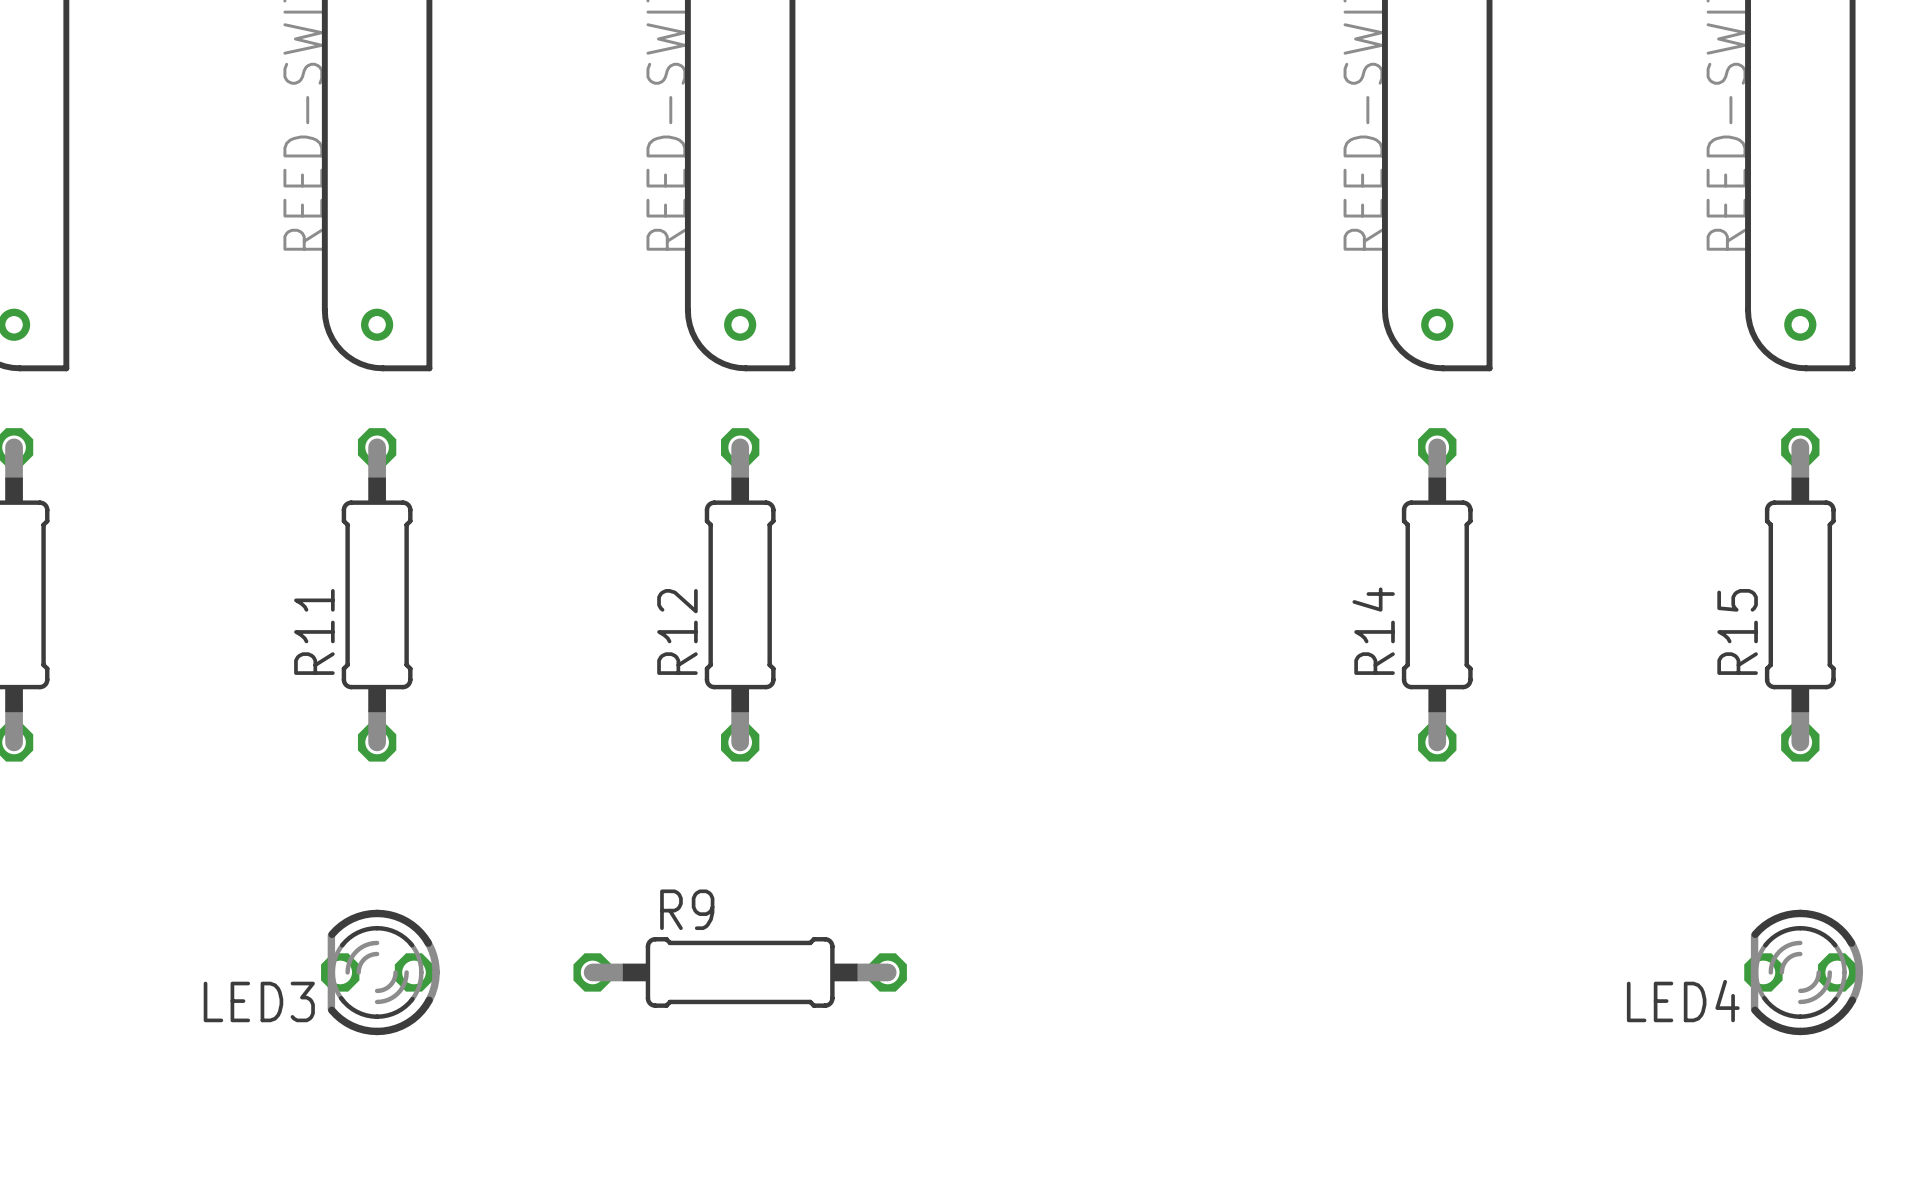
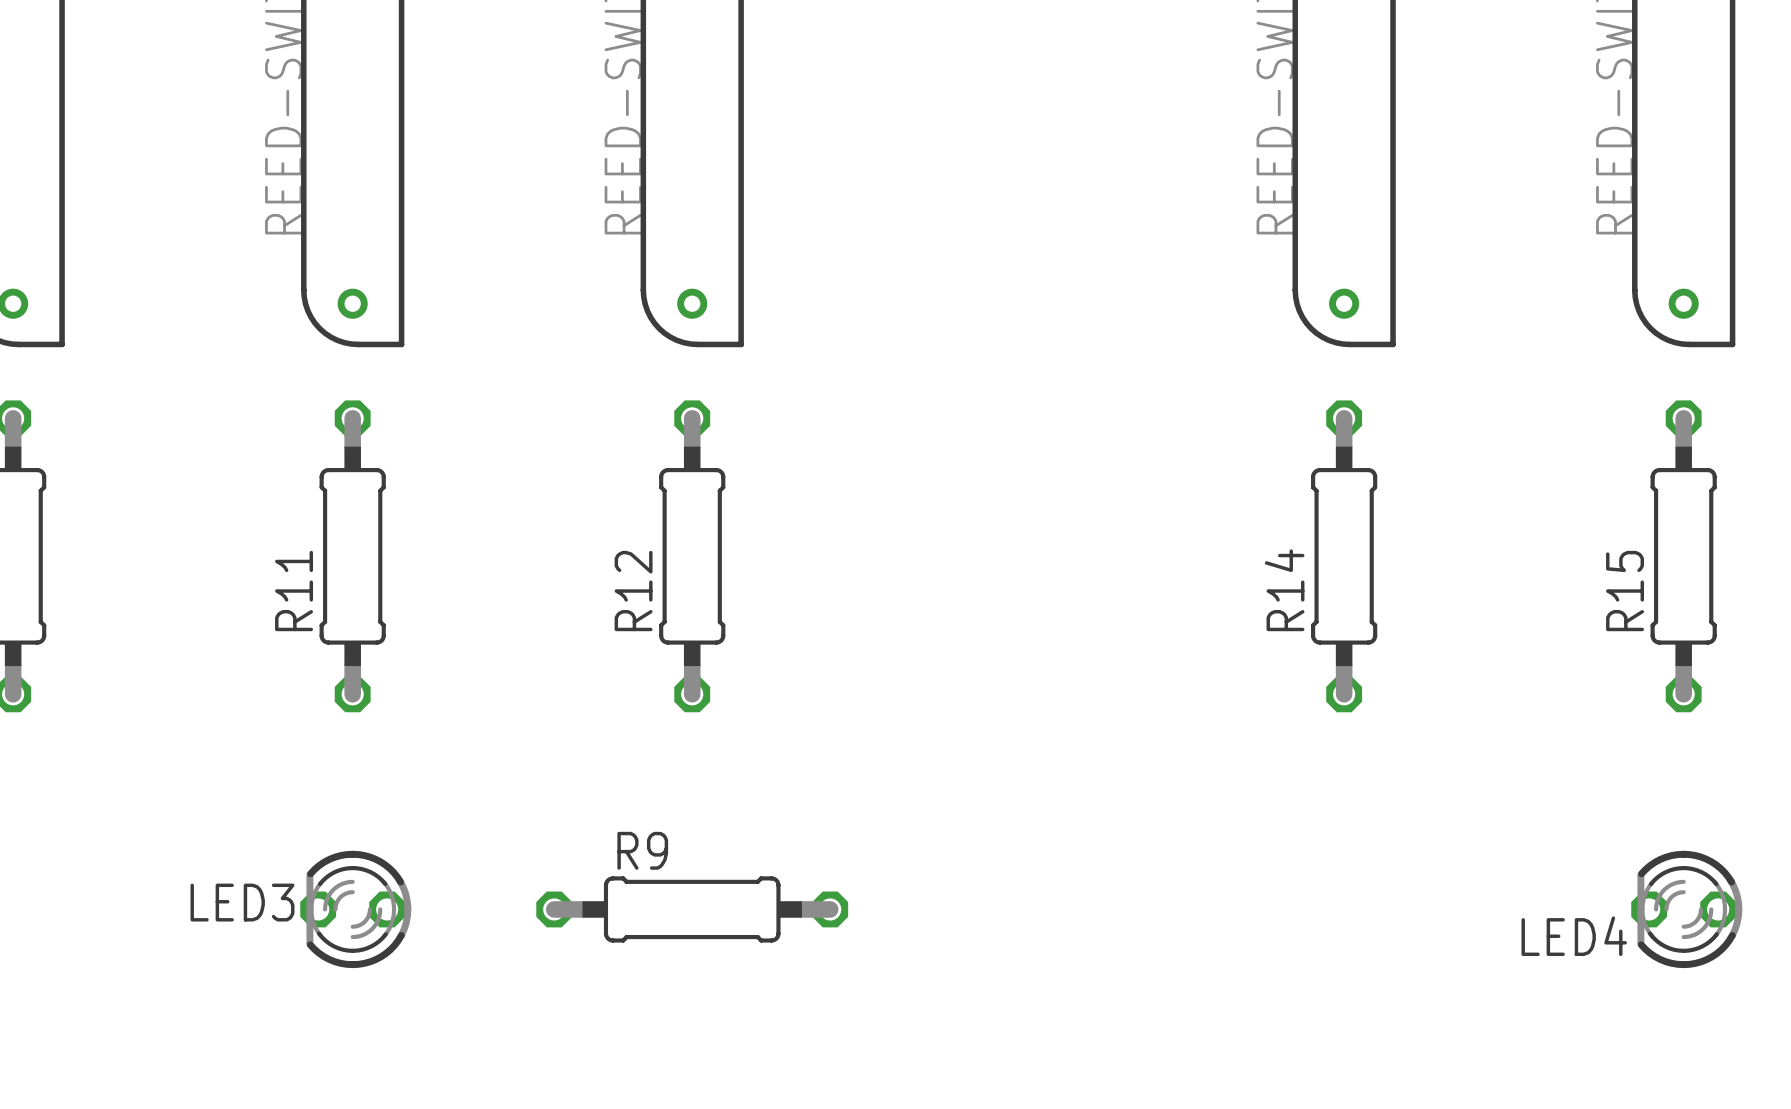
LED3 name position: LED3 (259, 1001) -> LED3 (242, 902)

